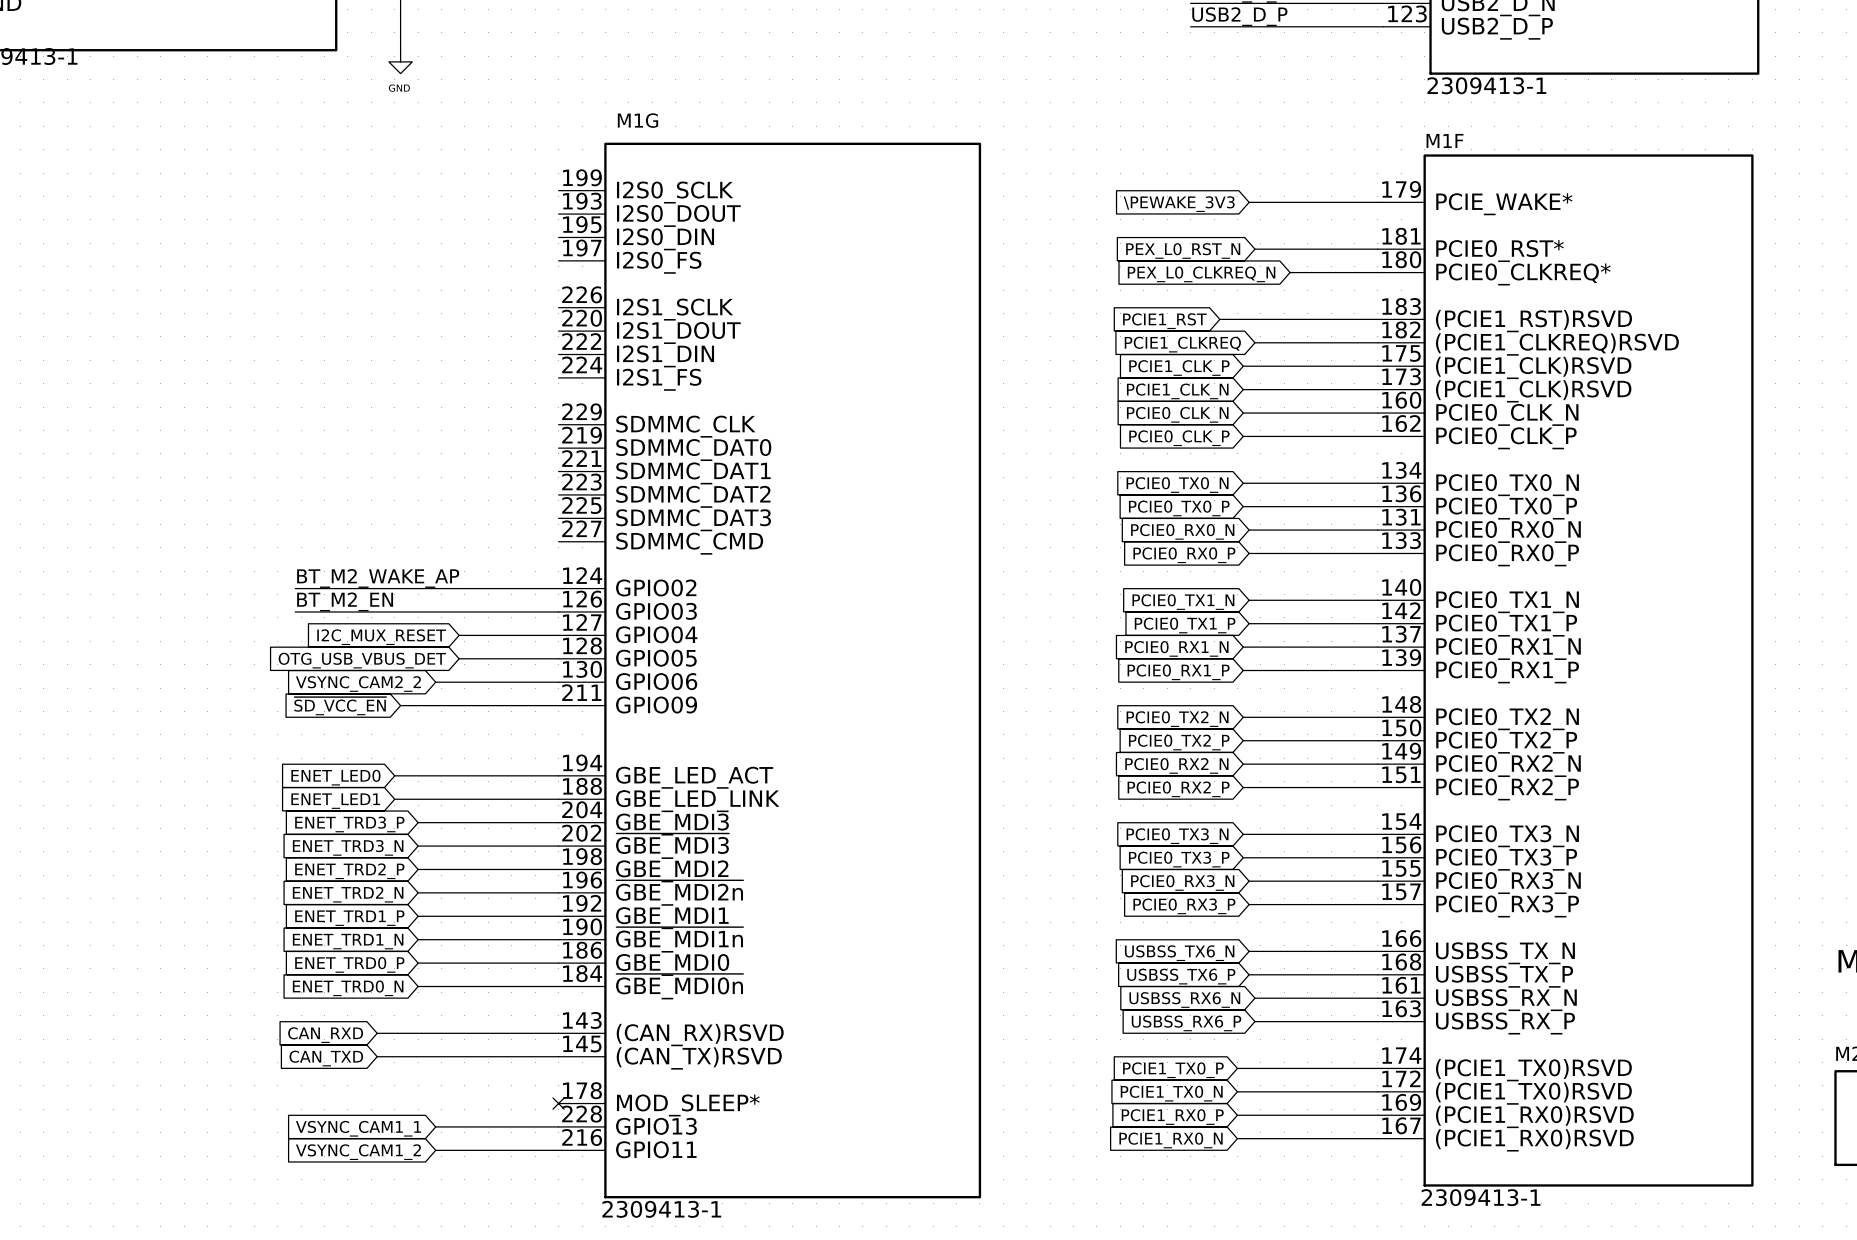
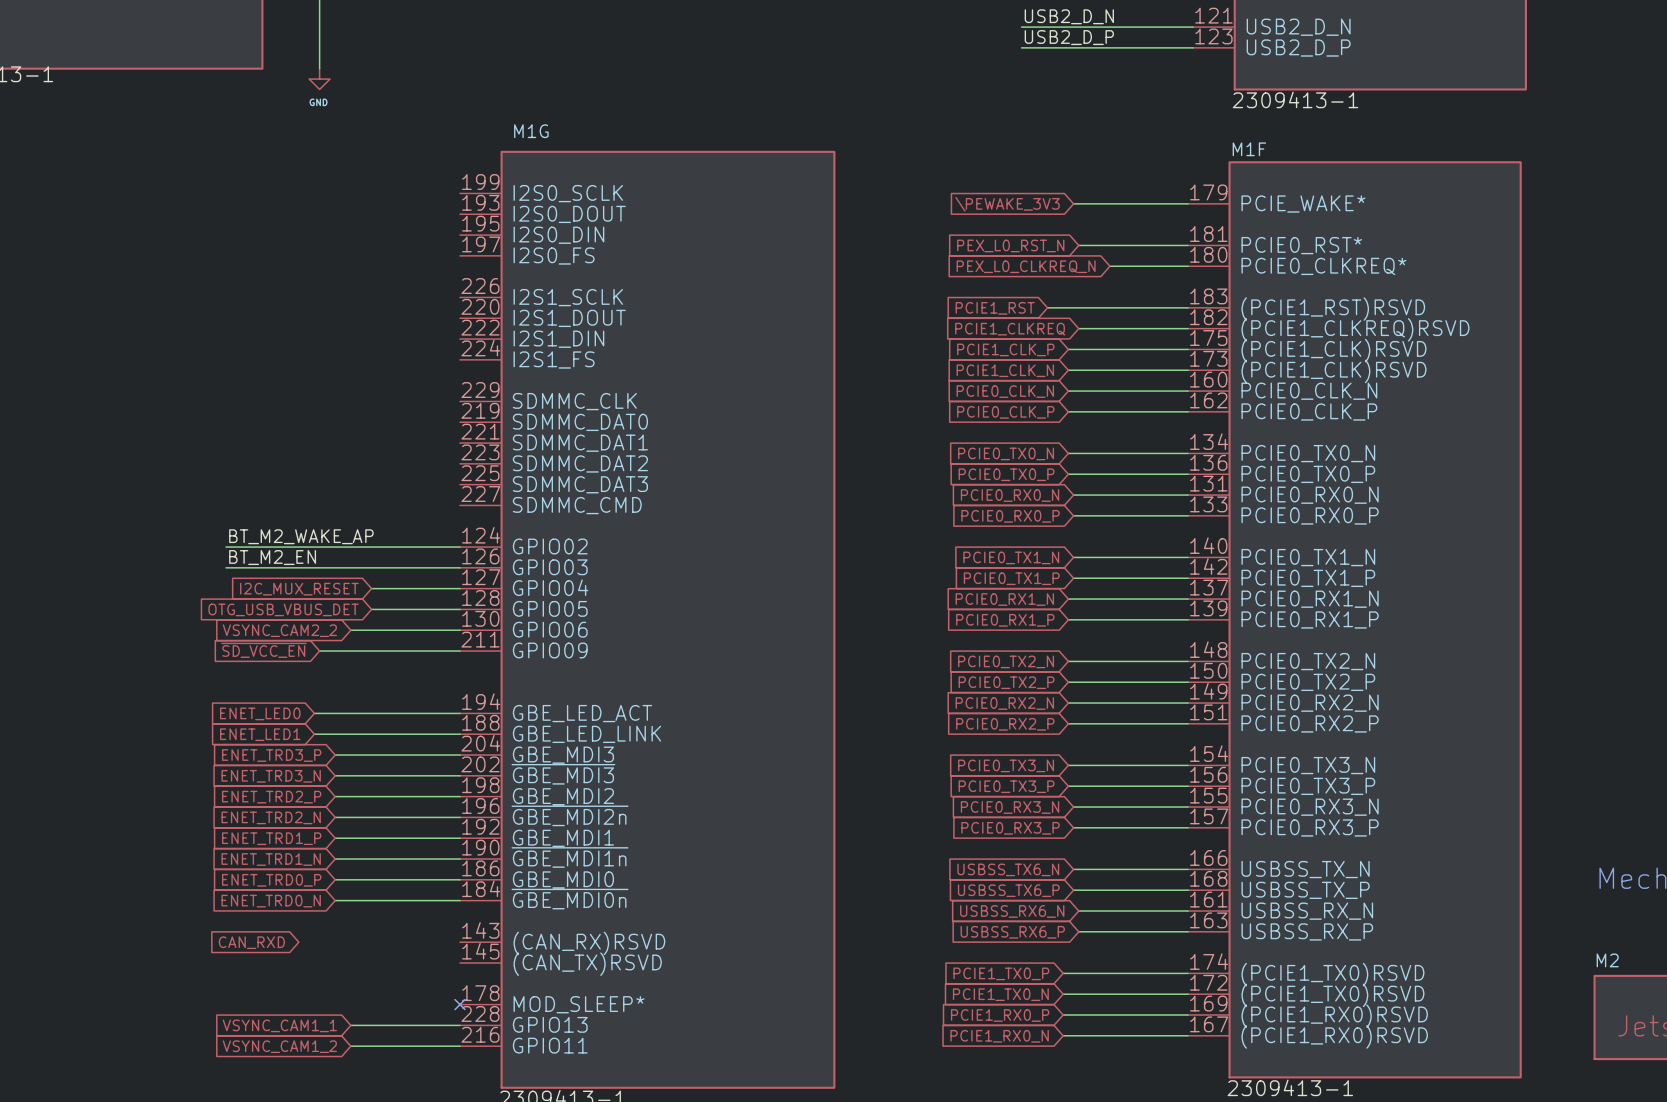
wire: (377, 1033) (558, 1033) -> none
wire: (377, 1056) (558, 1056) -> none
global label: CAN_TXD (326, 1058) -> none

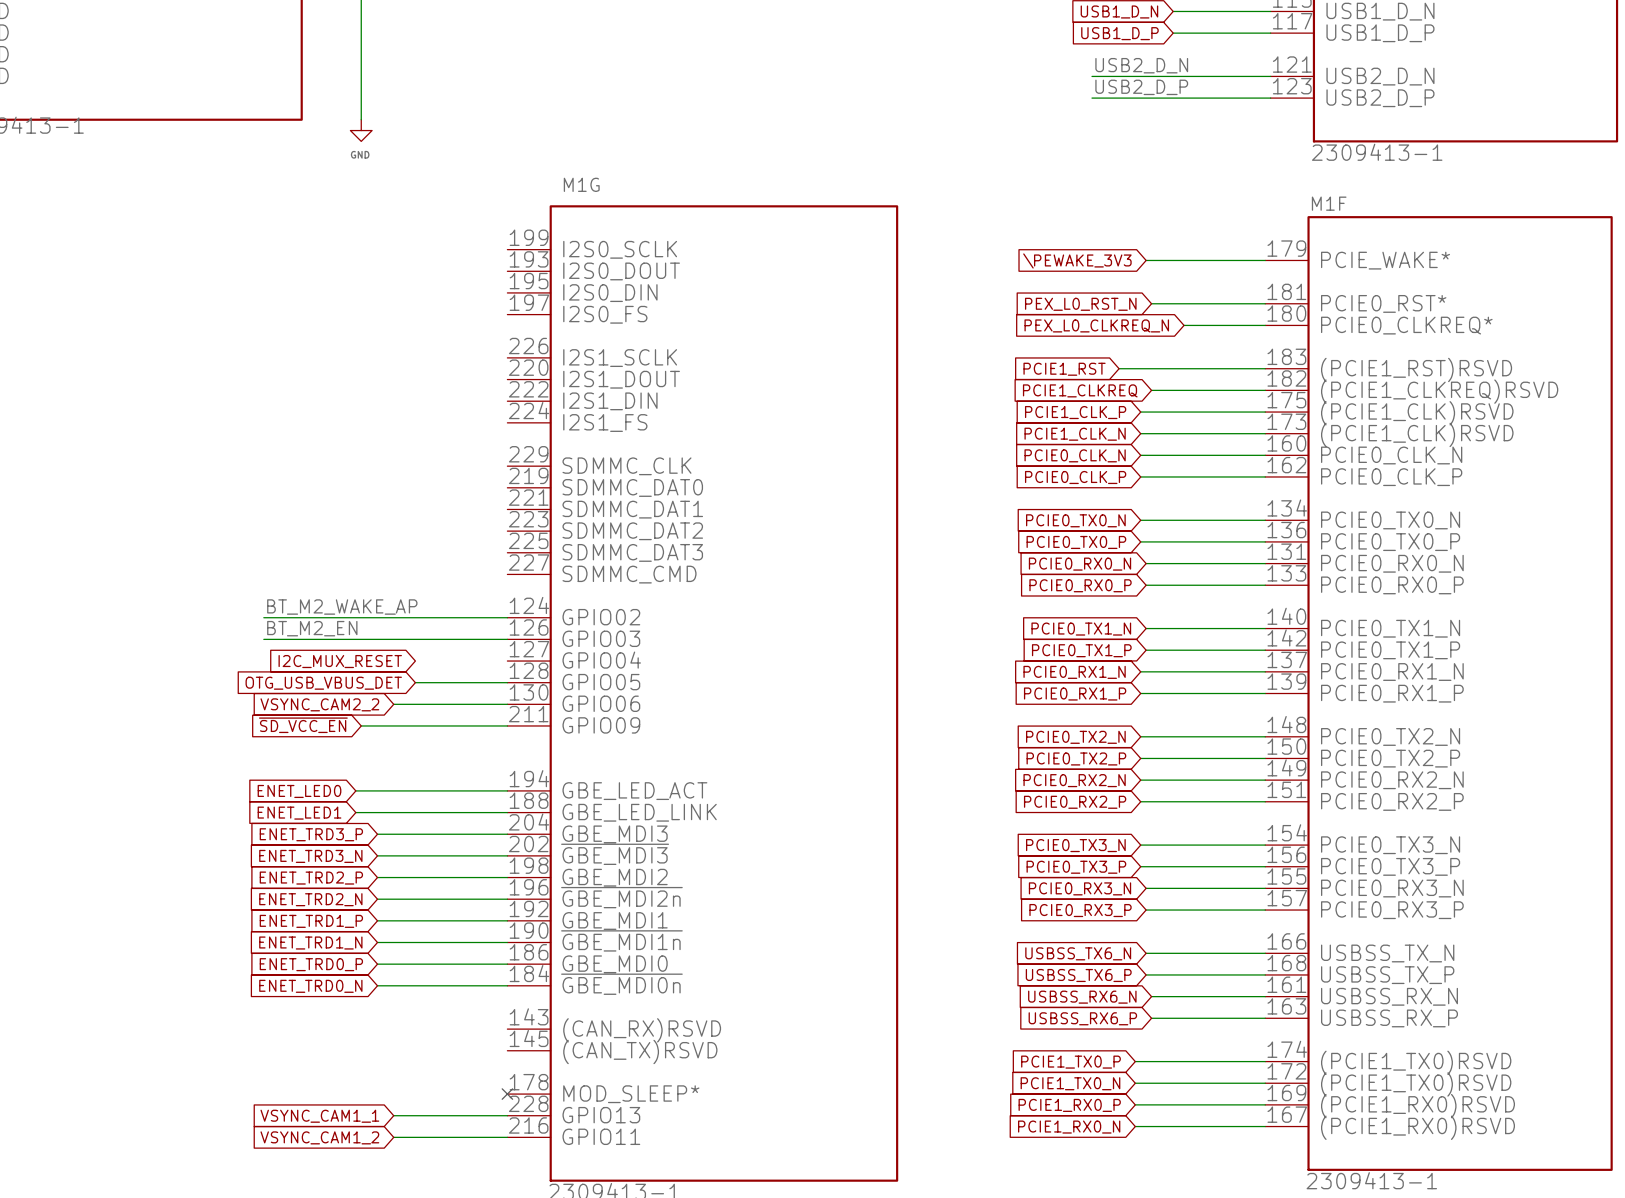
wire: (371, 588) (460, 588) -> none
global label: CAN_RXD (251, 942) -> none

